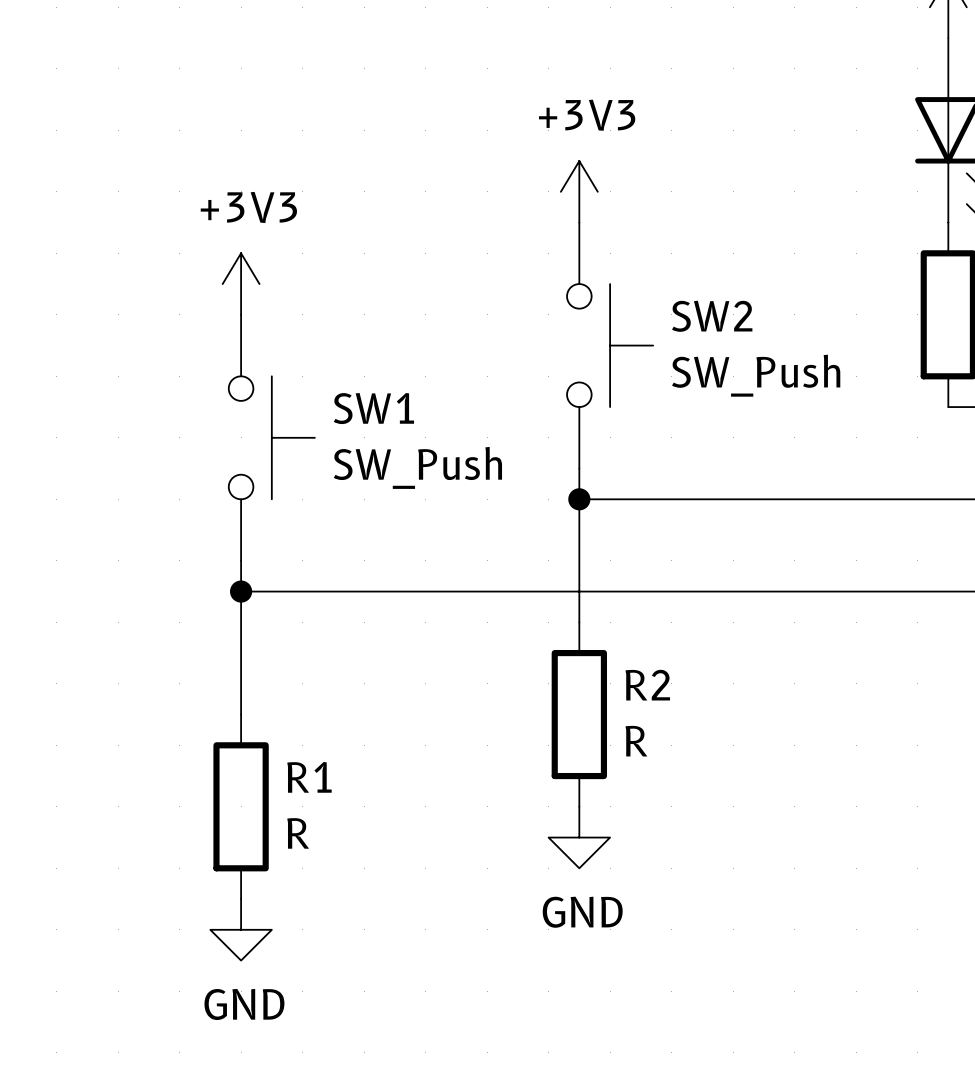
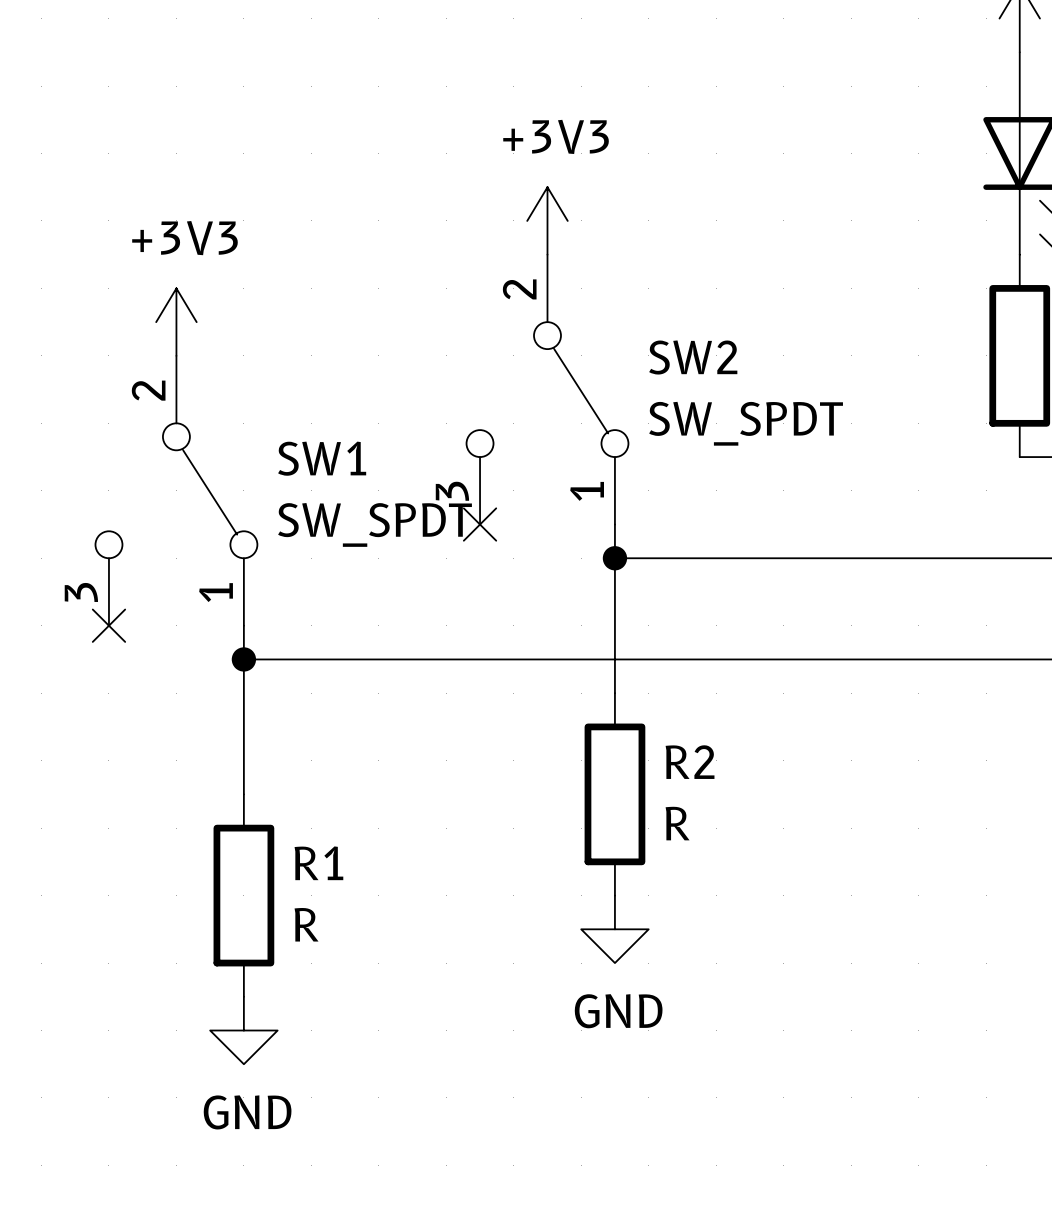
power symbol position: +3V3 (579, 191) -> +3V3 (547, 220)
SW2 symbol: [567, 222, 654, 469] -> [466, 254, 629, 525]
power symbol position: +3V3 (241, 284) -> +3V3 (176, 322)
SW1 symbol: [228, 314, 315, 561] -> [95, 355, 258, 626]
SW2 value: SW_Push (756, 375) -> SW_SPDT (746, 423)
SW1 value: SW_Push (417, 467) -> SW_SPDT (375, 524)
no-connect mark: none -> (480, 524)
no-connect mark: none -> (108, 625)

